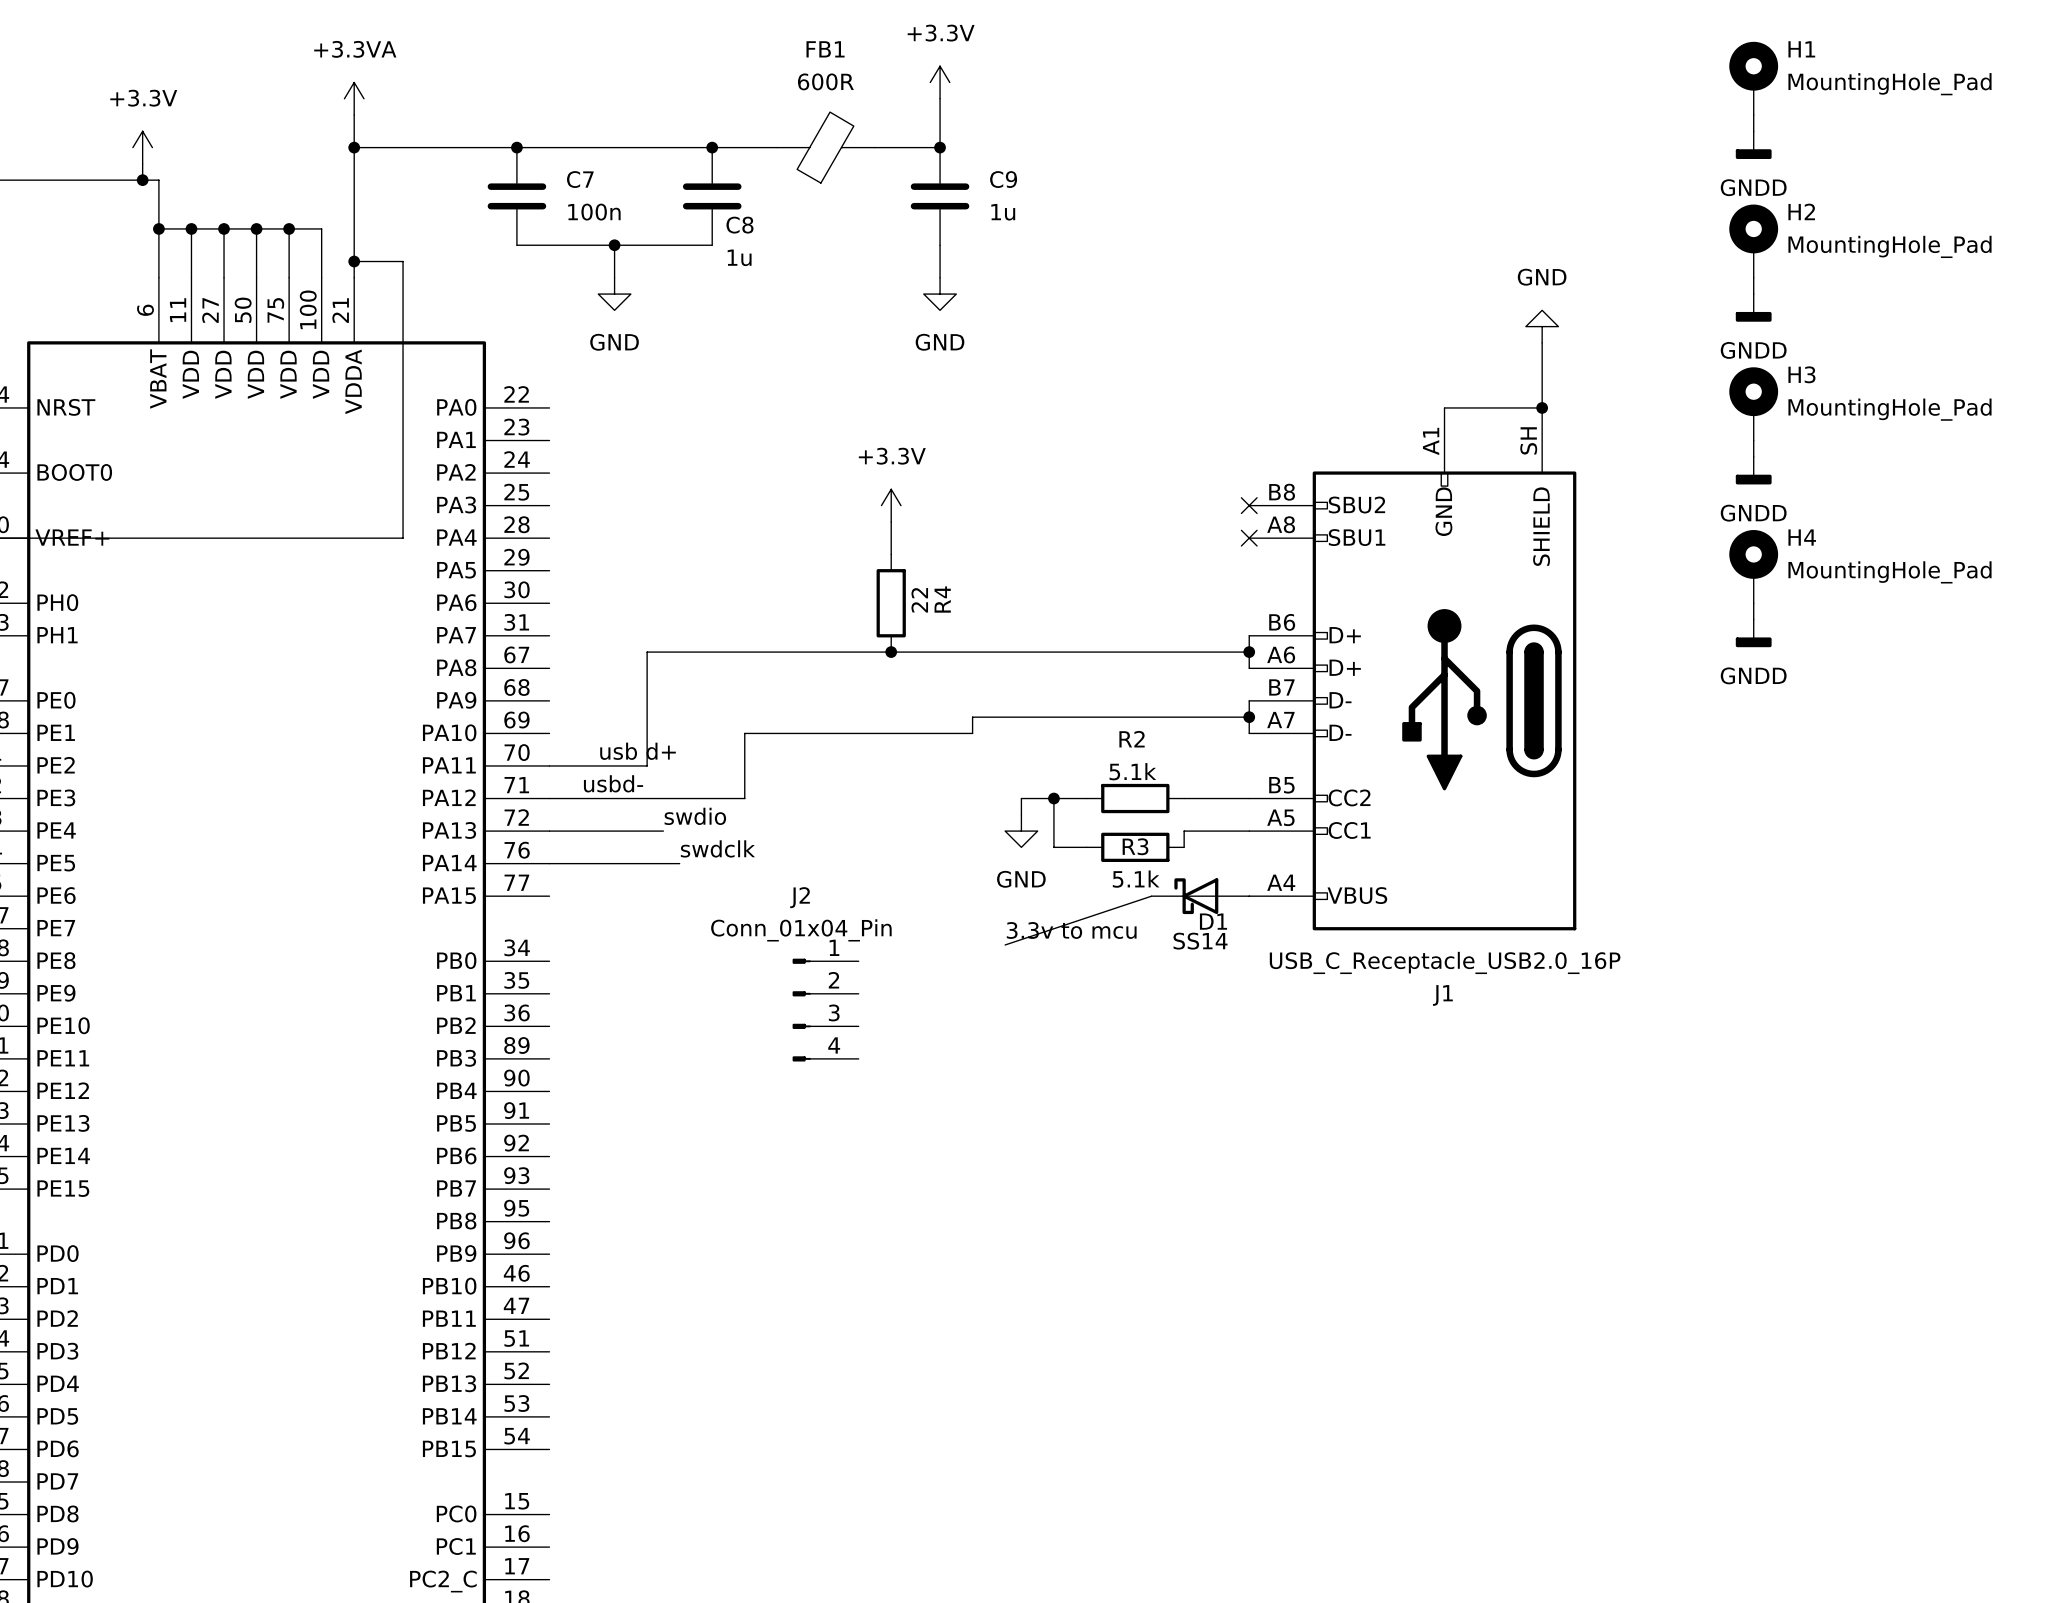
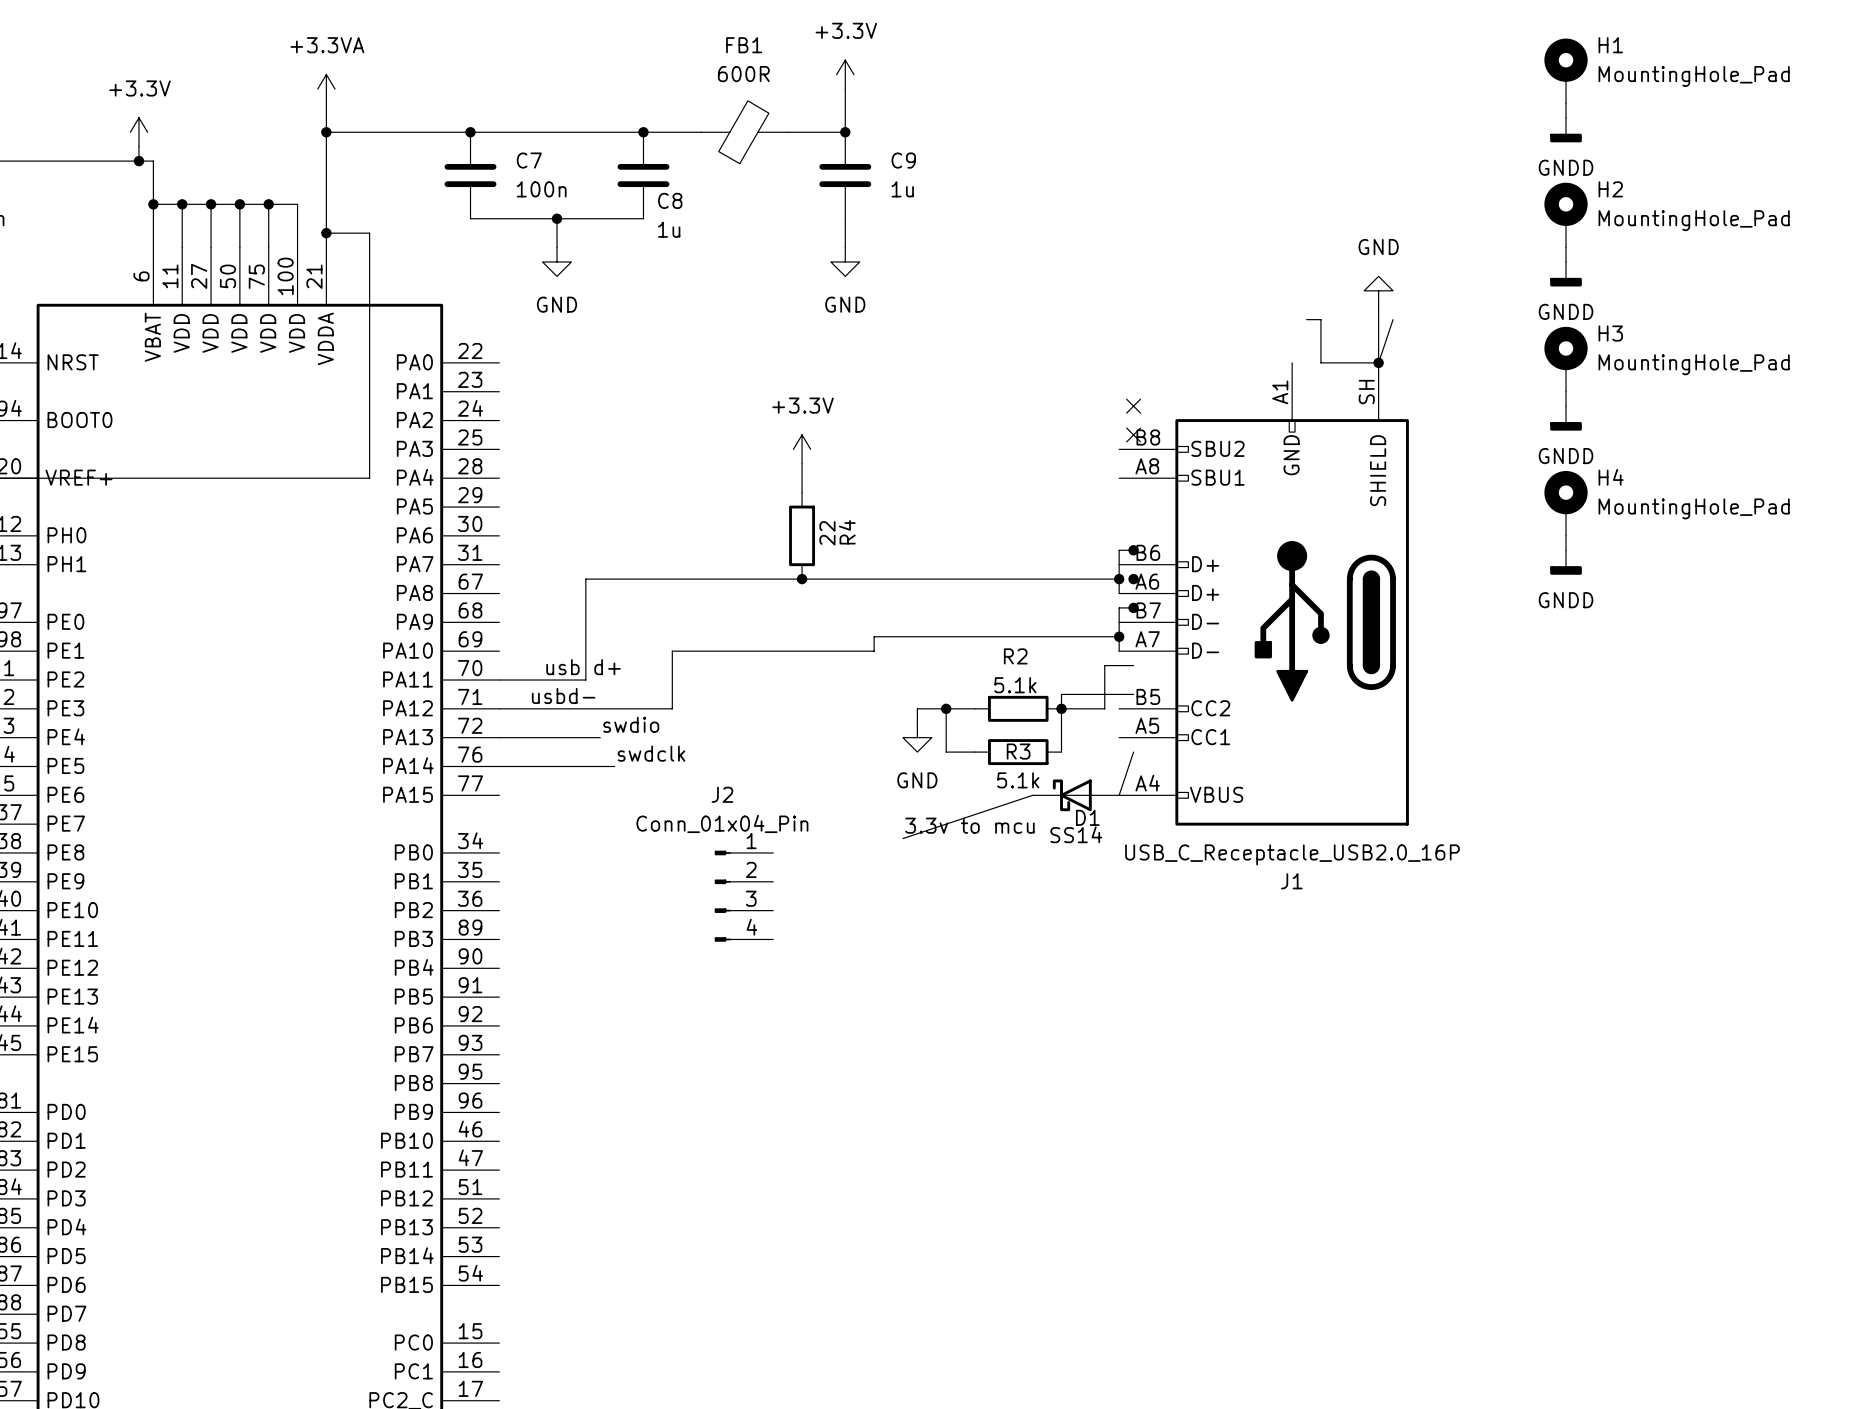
wire: none -> (1393, 319) (1378, 362)
wire: (1444, 407) (1477, 407) -> (1306, 319) (1320, 319) (1320, 362)
no-connect mark: none -> (1133, 406)
no-connect mark position: (1249, 505) -> (1133, 434)
no-connect mark: (1249, 538) -> none
wire: none -> (1133, 550) (1119, 550) (1119, 564)
junction: none -> (1133, 550)
junction: none -> (1133, 579)
wire: none -> (1133, 607) (1119, 607) (1119, 622)
junction: none -> (1133, 607)
junction: none -> (1061, 708)
wire: (1232, 798) (1249, 798) -> (1104, 708) (1104, 665) (1133, 665)
wire: (1184, 831) (1249, 831) -> (1061, 737) (1061, 694) (1133, 694)
wire: none -> (1133, 752) (1119, 795)

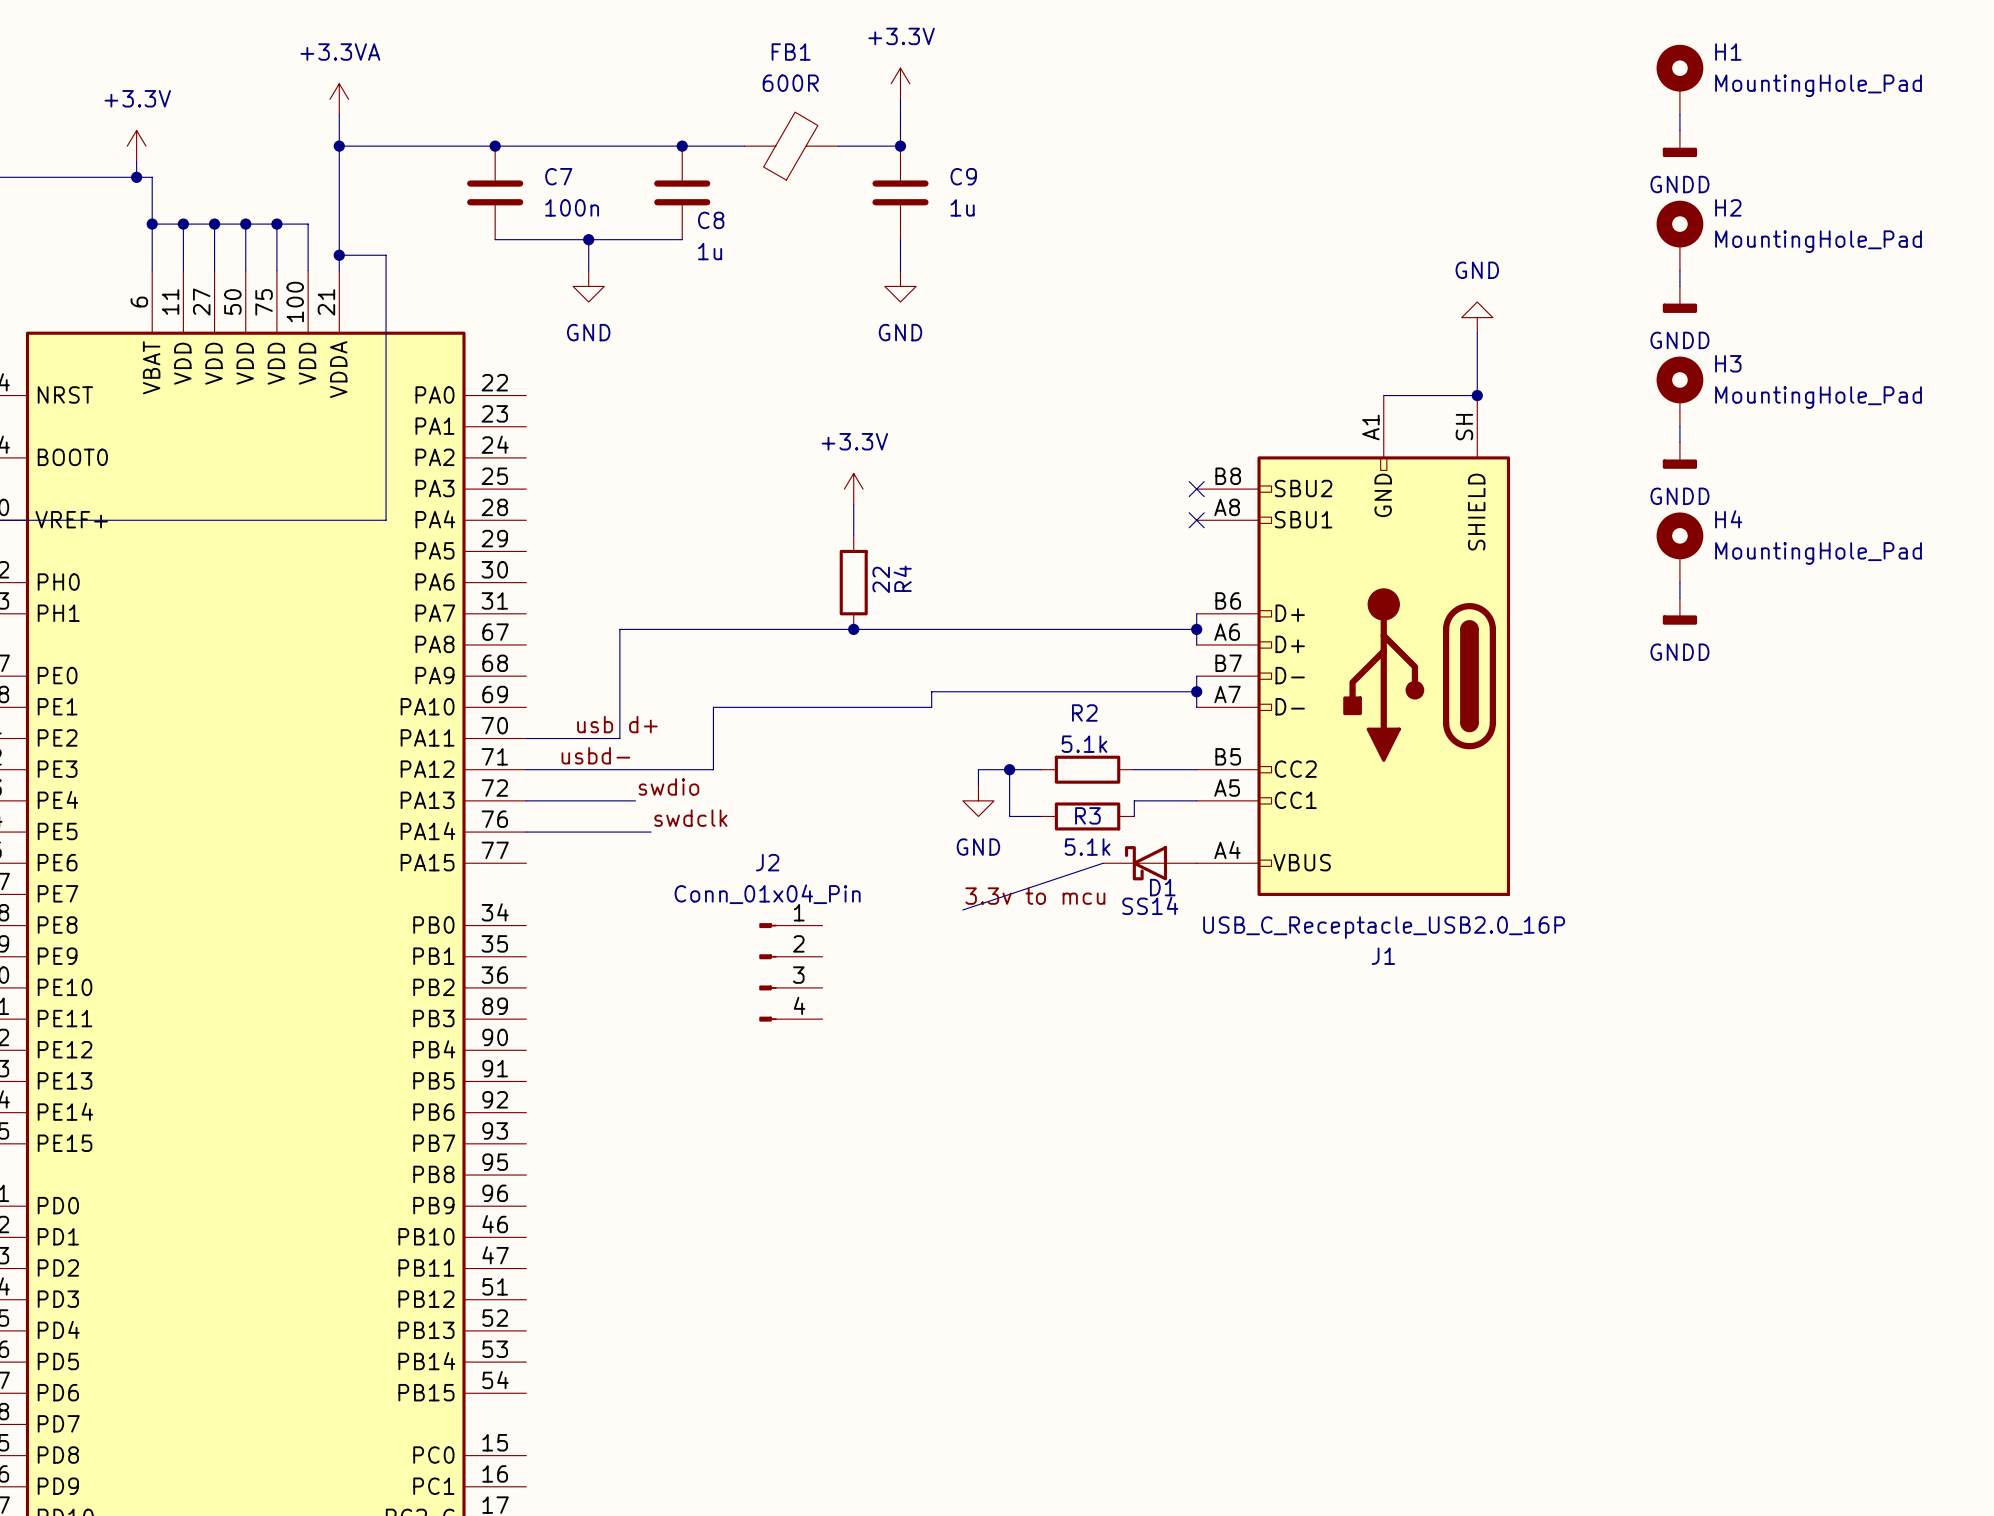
wire: (1306, 319) (1320, 319) (1320, 362) -> (1383, 395) (1414, 395)
wire: (1393, 319) (1378, 362) -> none
no-connect mark: (1133, 406) -> none
no-connect mark position: (1133, 434) -> (1196, 489)
no-connect mark: none -> (1196, 520)
wire: (1133, 550) (1119, 550) (1119, 564) -> none
junction: (1133, 550) -> none
junction: (1133, 579) -> none
wire: (1133, 607) (1119, 607) (1119, 622) -> none
junction: (1133, 607) -> none
wire: (1133, 665) (1104, 665) (1104, 708) -> (1196, 769) (1181, 769)
wire: (1133, 694) (1061, 694) (1061, 737) -> (1196, 800) (1134, 800)
junction: (1061, 708) -> none
wire: (1133, 752) (1119, 795) -> none

